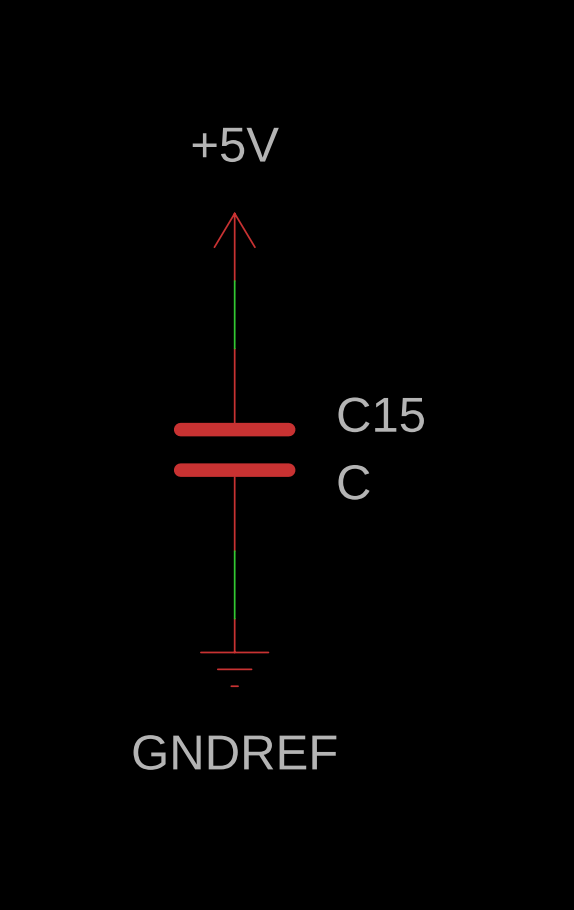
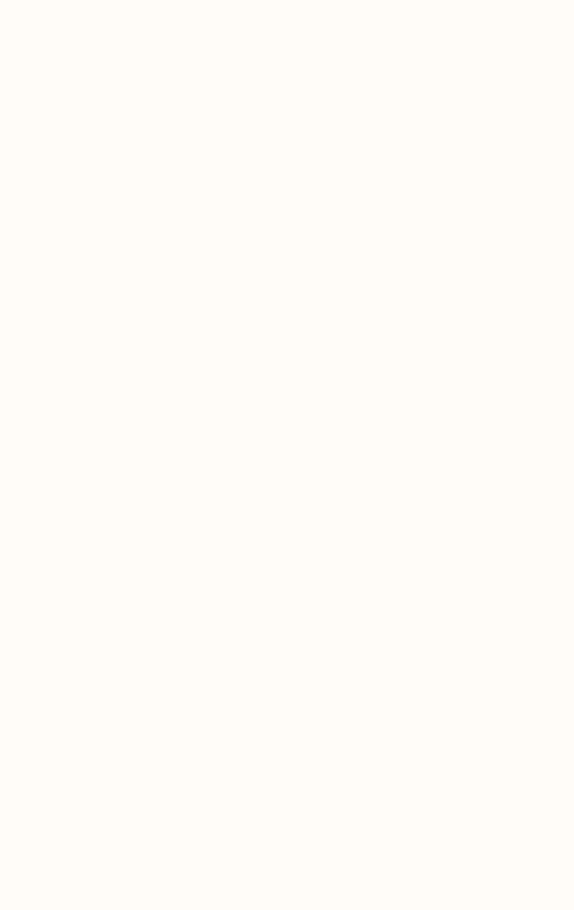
power symbol: +5V (234, 247) -> none
wire: (234, 281) (234, 348) -> none
C15: C (234, 449) -> none
wire: (234, 551) (234, 618) -> none
power symbol: GNDREF (234, 652) -> none

